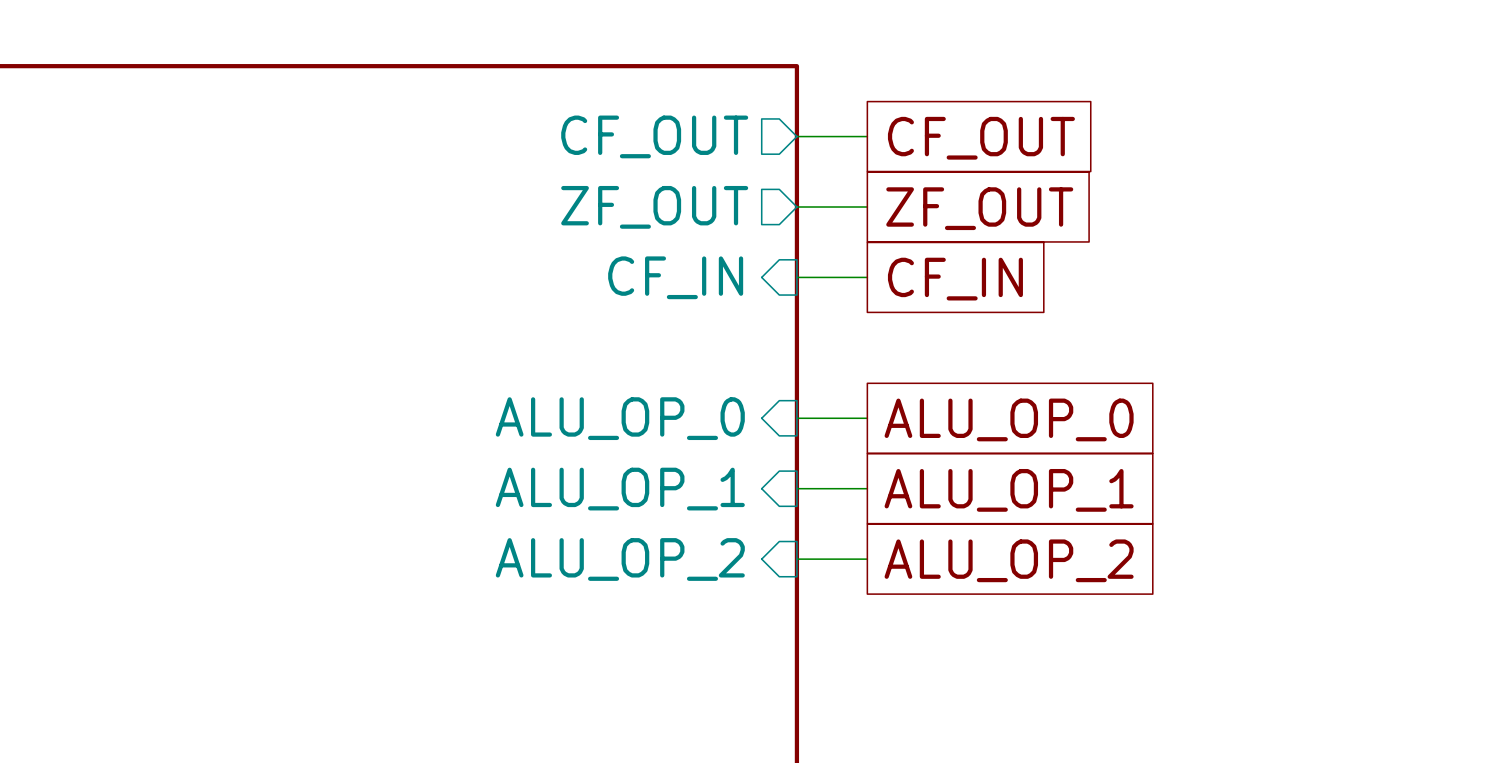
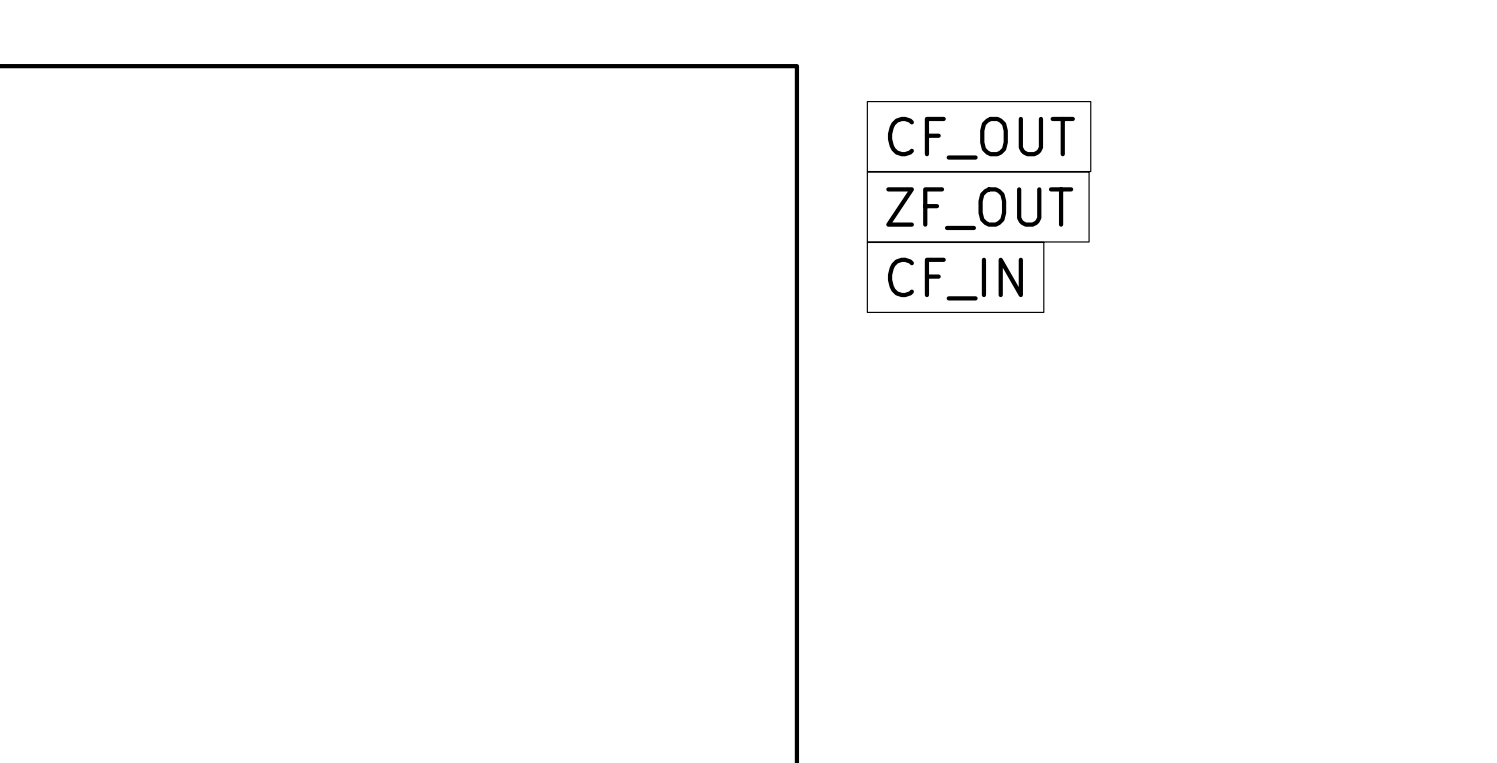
sheet pin: CF_OUT (654, 136) -> none
wire: (796, 136) (867, 136) -> none
sheet pin: ZF_OUT (654, 207) -> none
wire: (796, 207) (867, 207) -> none
sheet pin: CF_IN (675, 277) -> none
wire: (796, 277) (867, 277) -> none
sheet pin: ALU_OP_0 (620, 418) -> none
wire: (796, 418) (867, 418) -> none
global label: ALU_OP_0 (1009, 419) -> none
wire: (796, 488) (867, 488) -> none
sheet pin: ALU_OP_1 (620, 489) -> none
global label: ALU_OP_1 (1009, 490) -> none
sheet pin: ALU_OP_2 (620, 559) -> none
wire: (796, 559) (867, 559) -> none
global label: ALU_OP_2 (1009, 560) -> none

